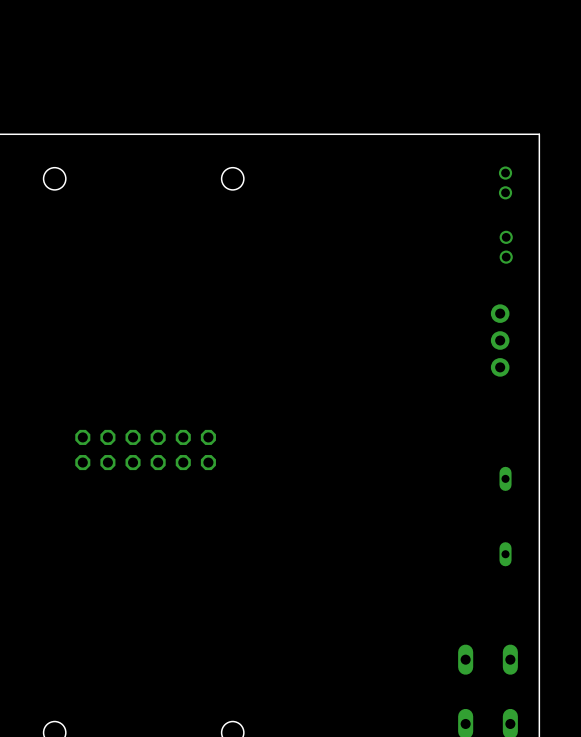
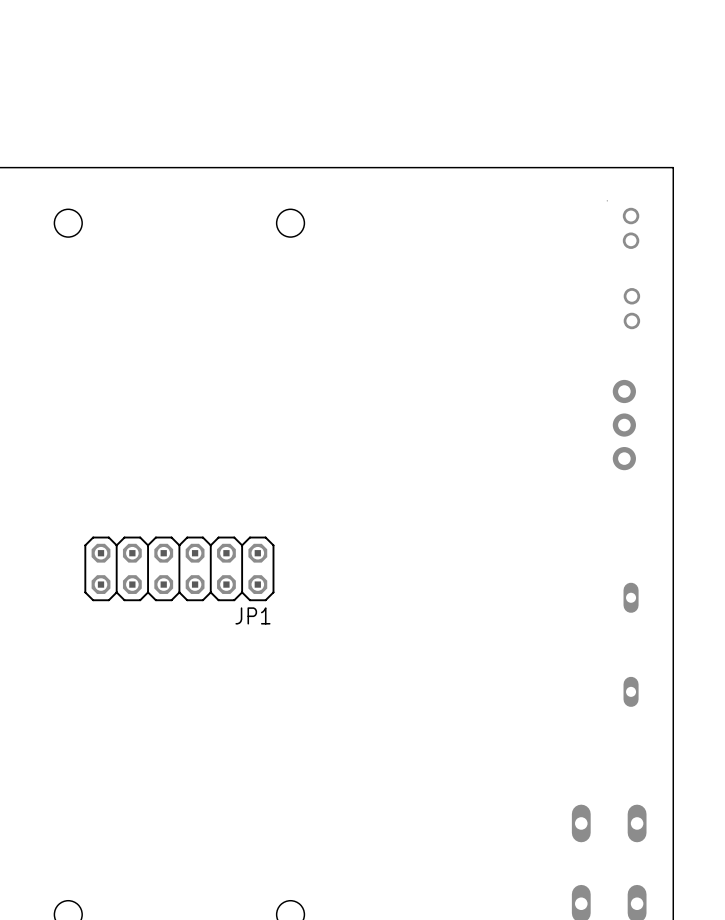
JP1 side: top (145, 449) -> bottom (179, 568)

